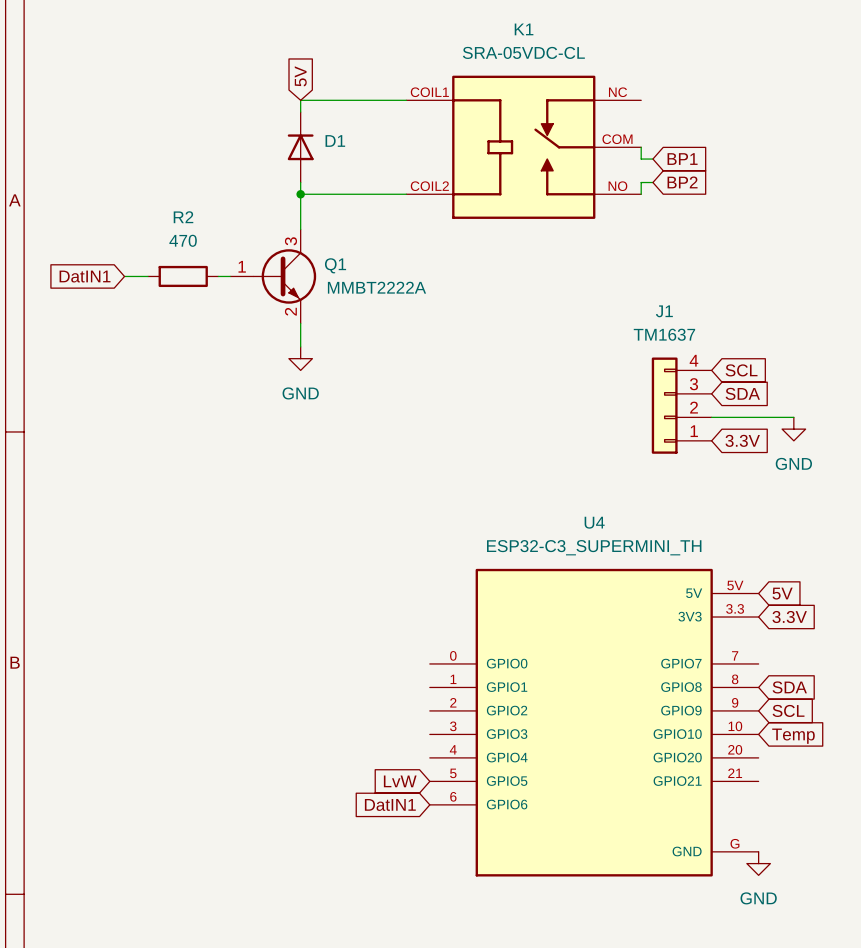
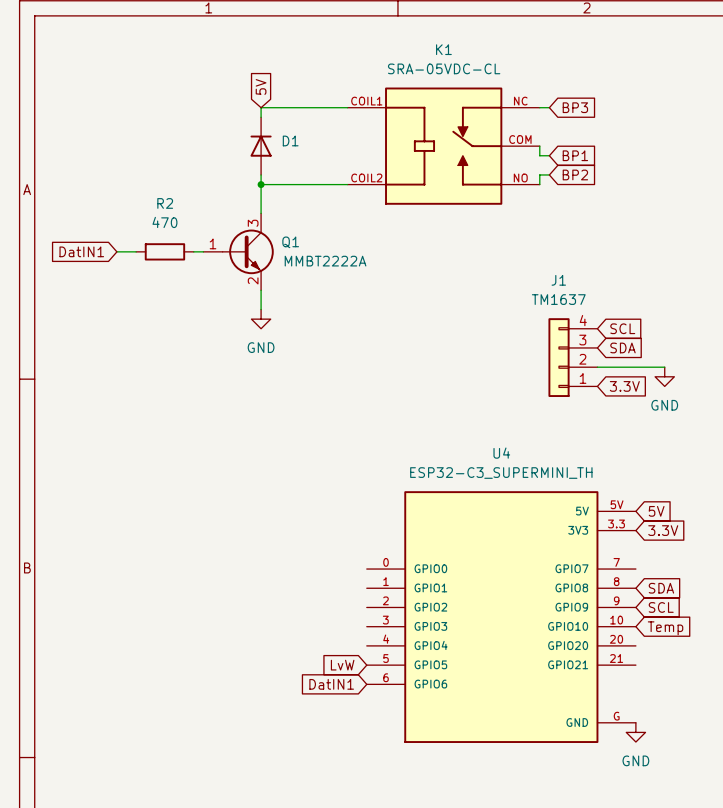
wire: none -> (539, 107) (549, 107)
global label: none -> BP3 (575, 107)

